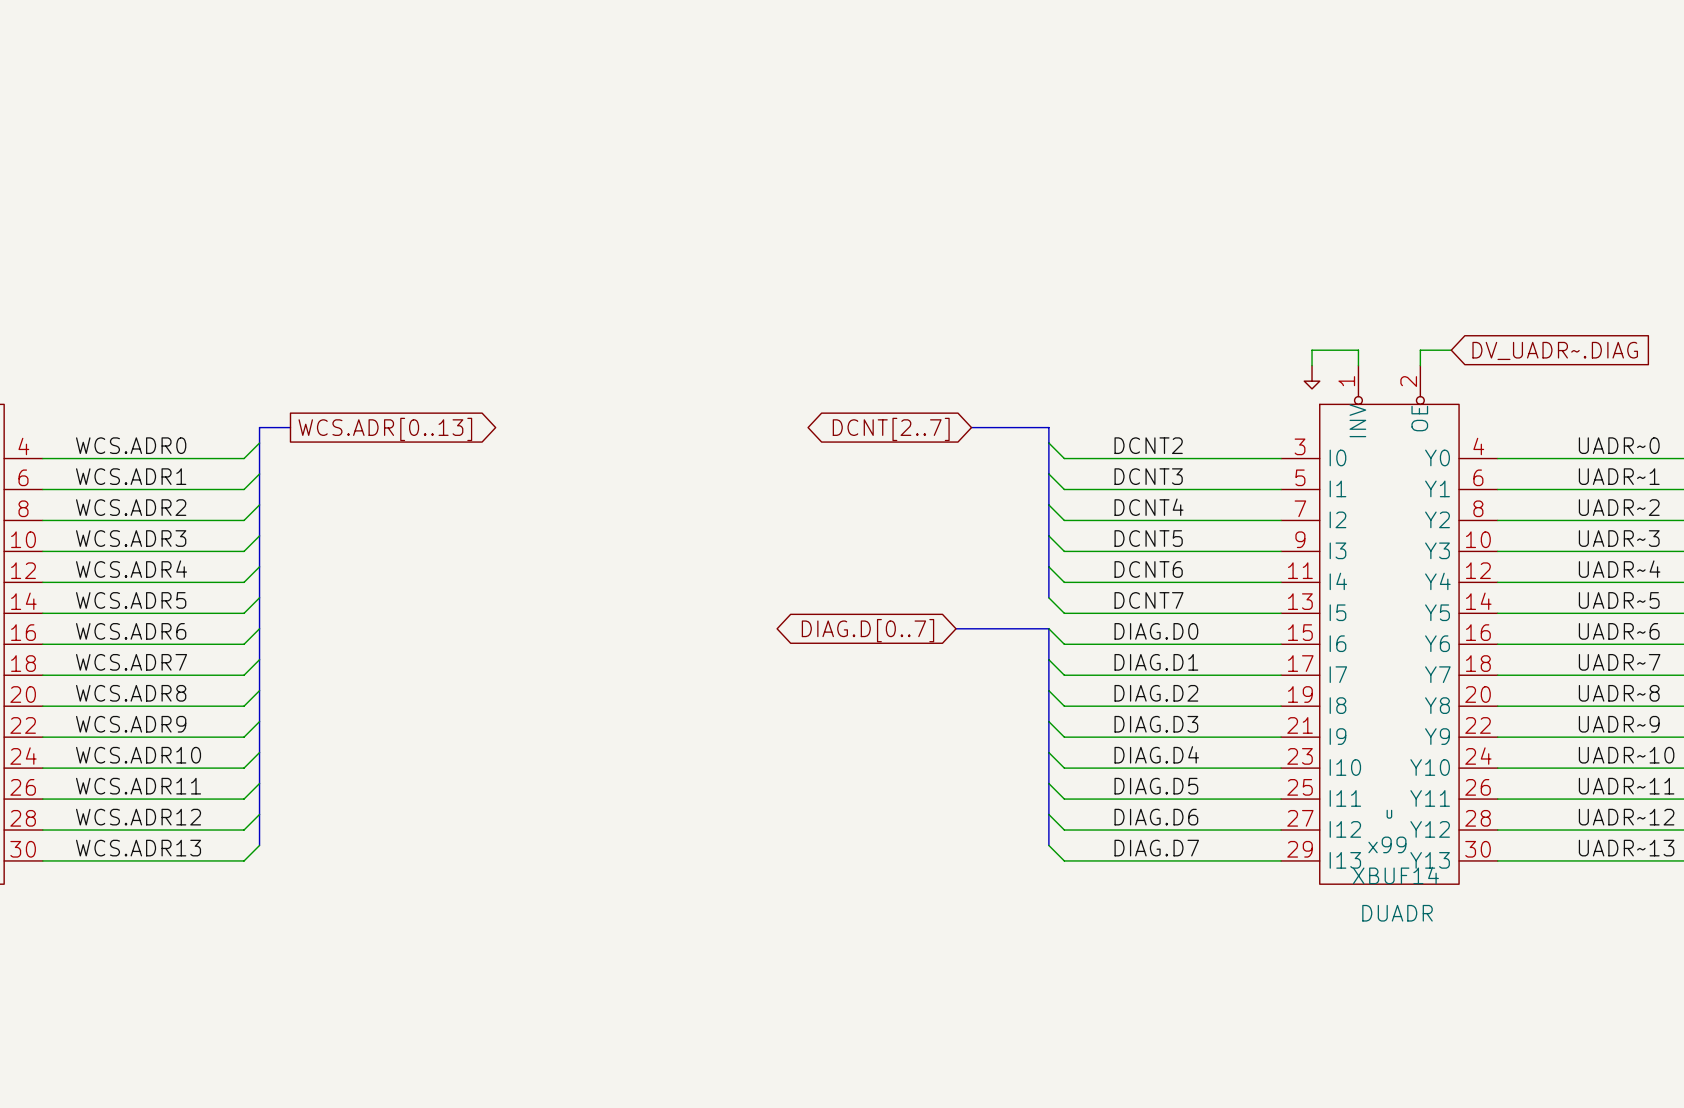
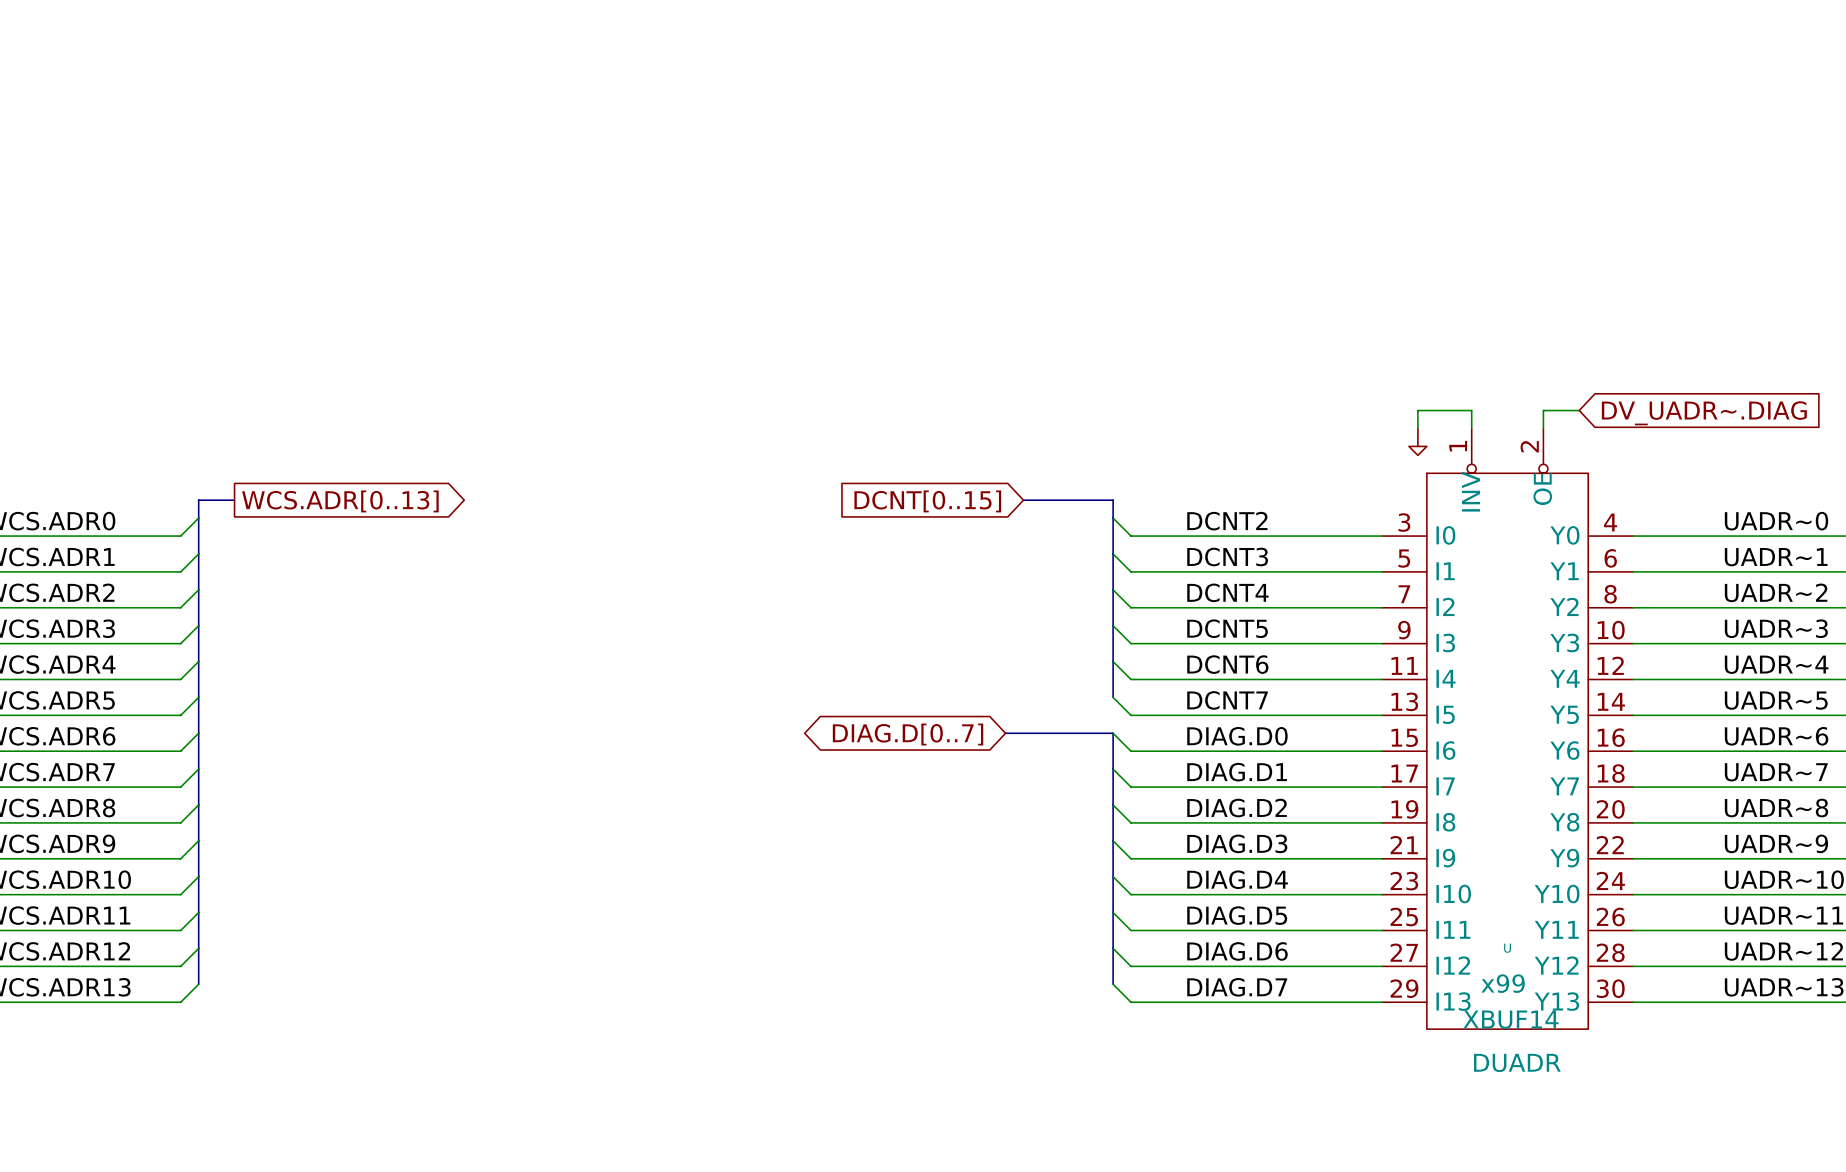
global label shape: bidirectional (891, 429) -> input (927, 501)
global label: DCNT[2..7] (891, 429) -> DCNT[0..15] (927, 501)

